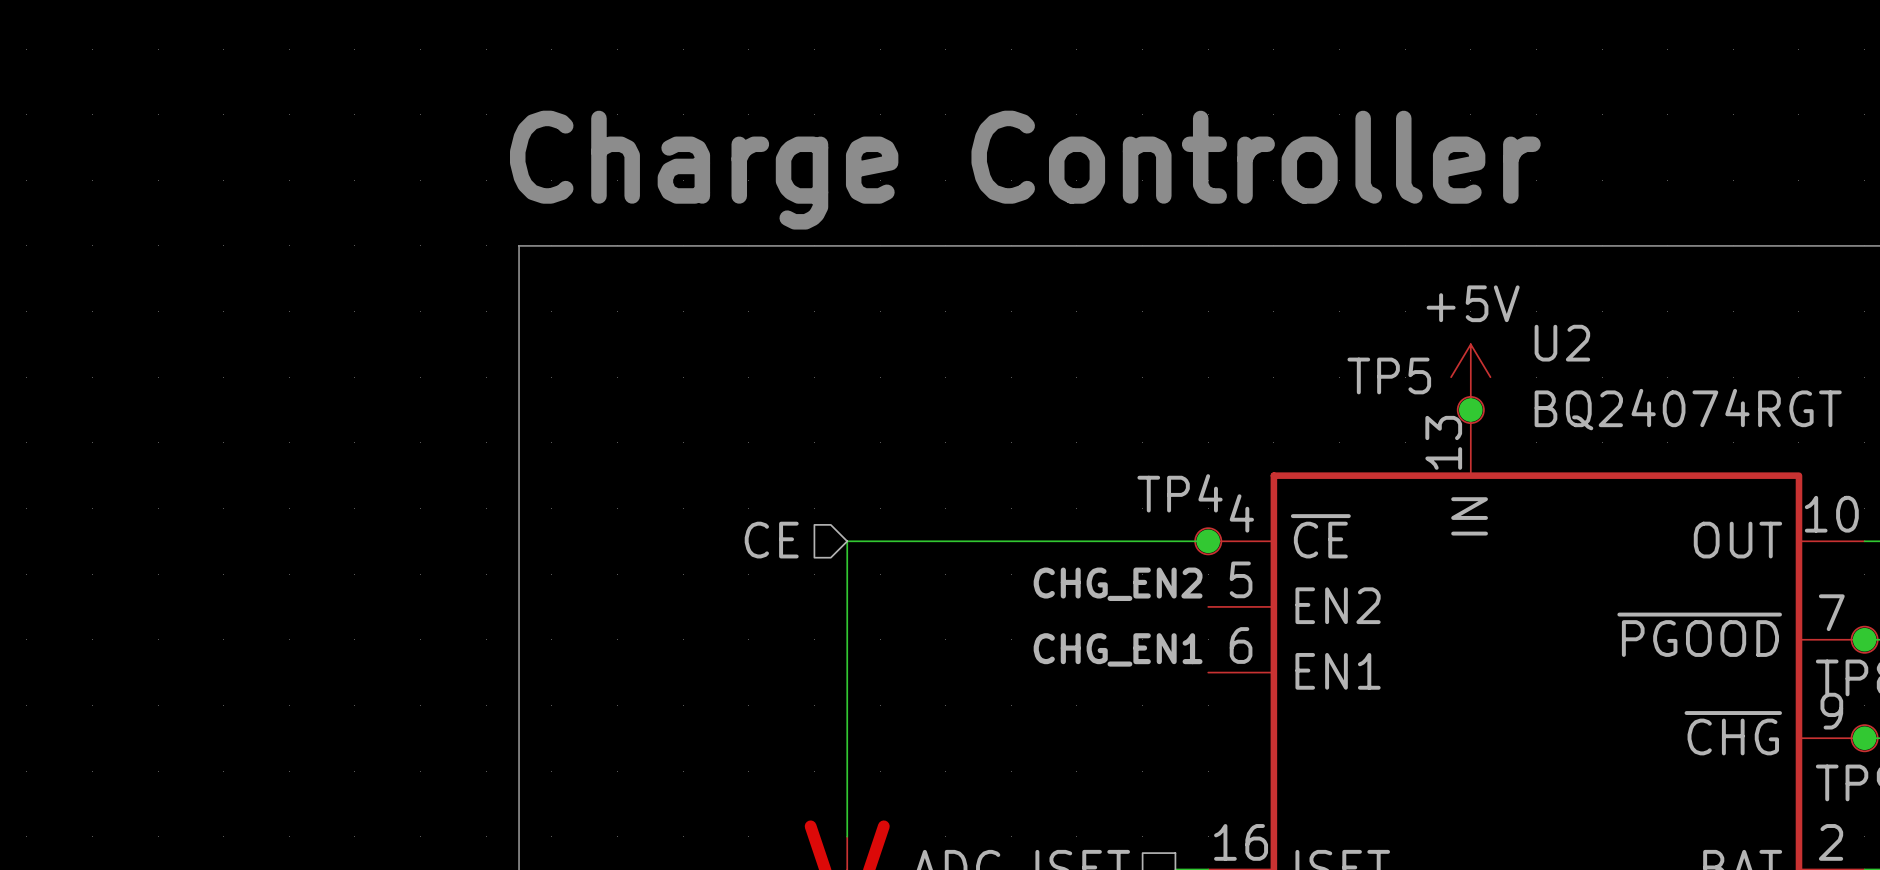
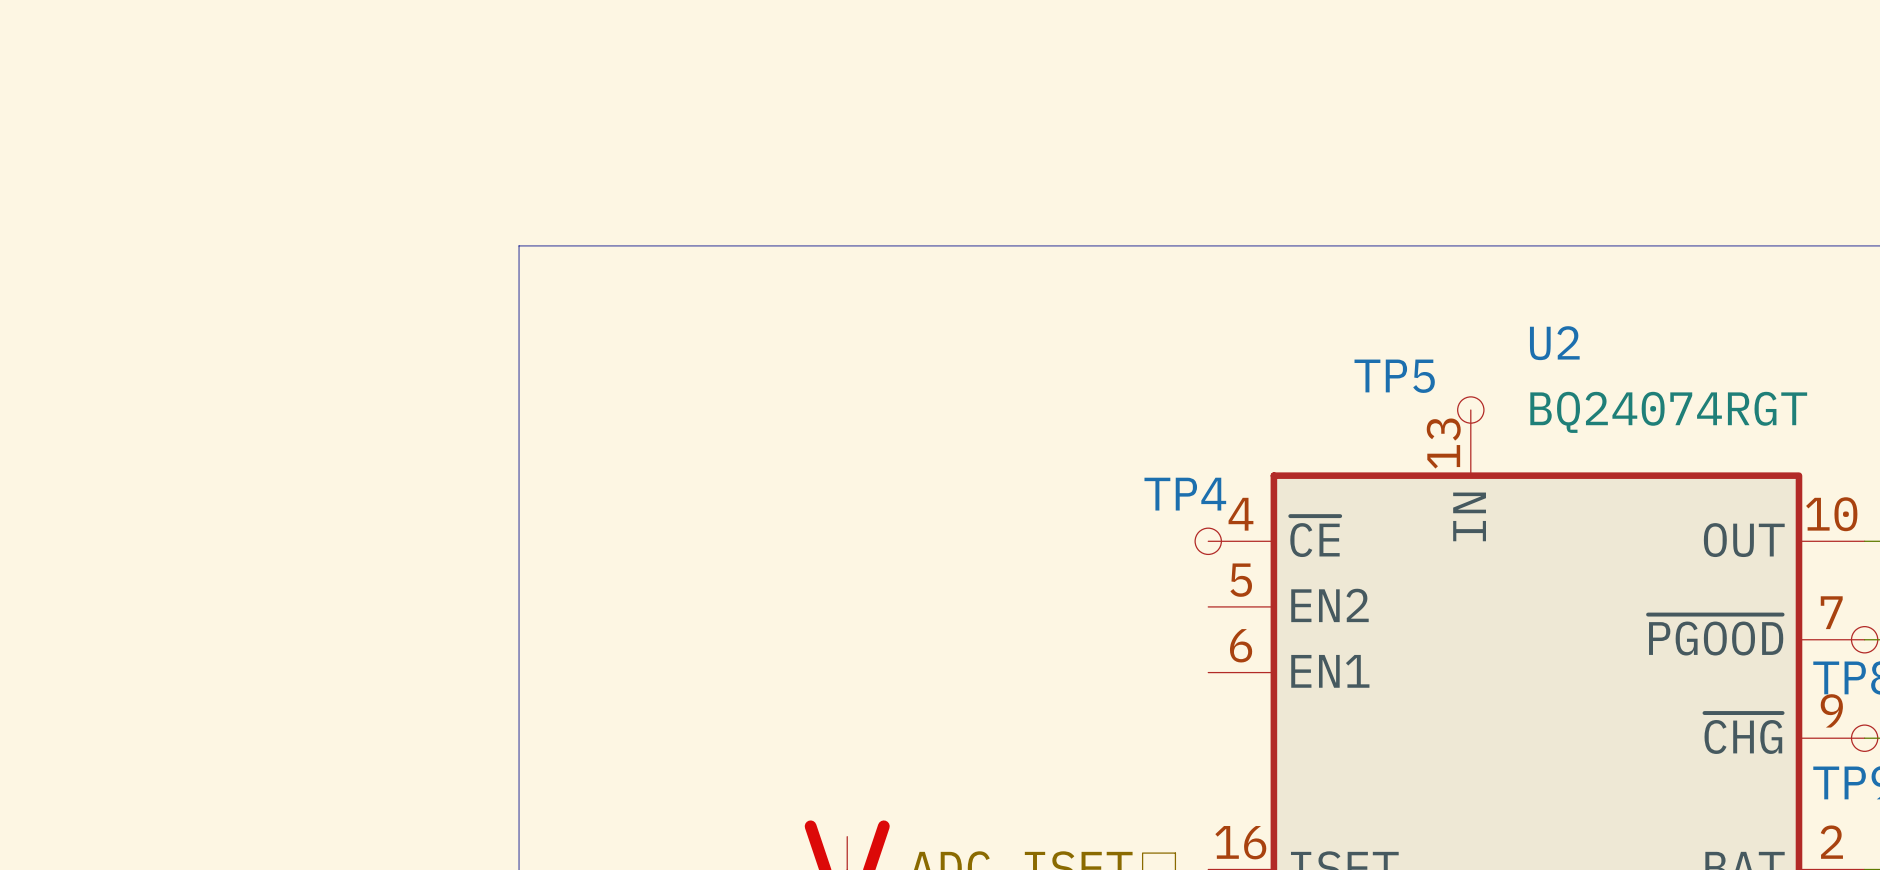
text: Charge Controller (1025, 170) -> none
power symbol: +5V (1470, 377) -> none
junction: (1470, 410) -> none
hierarchical label: CE (771, 540) -> none
wire: (1208, 541) (847, 541) (847, 836) -> none
junction: (1208, 541) -> none
label: CHG_EN2 (1118, 584) -> none
junction: (1864, 639) -> none
label: CHG_EN1 (1118, 649) -> none
junction: (1864, 738) -> none
wire: (1175, 869) (1208, 869) -> none

